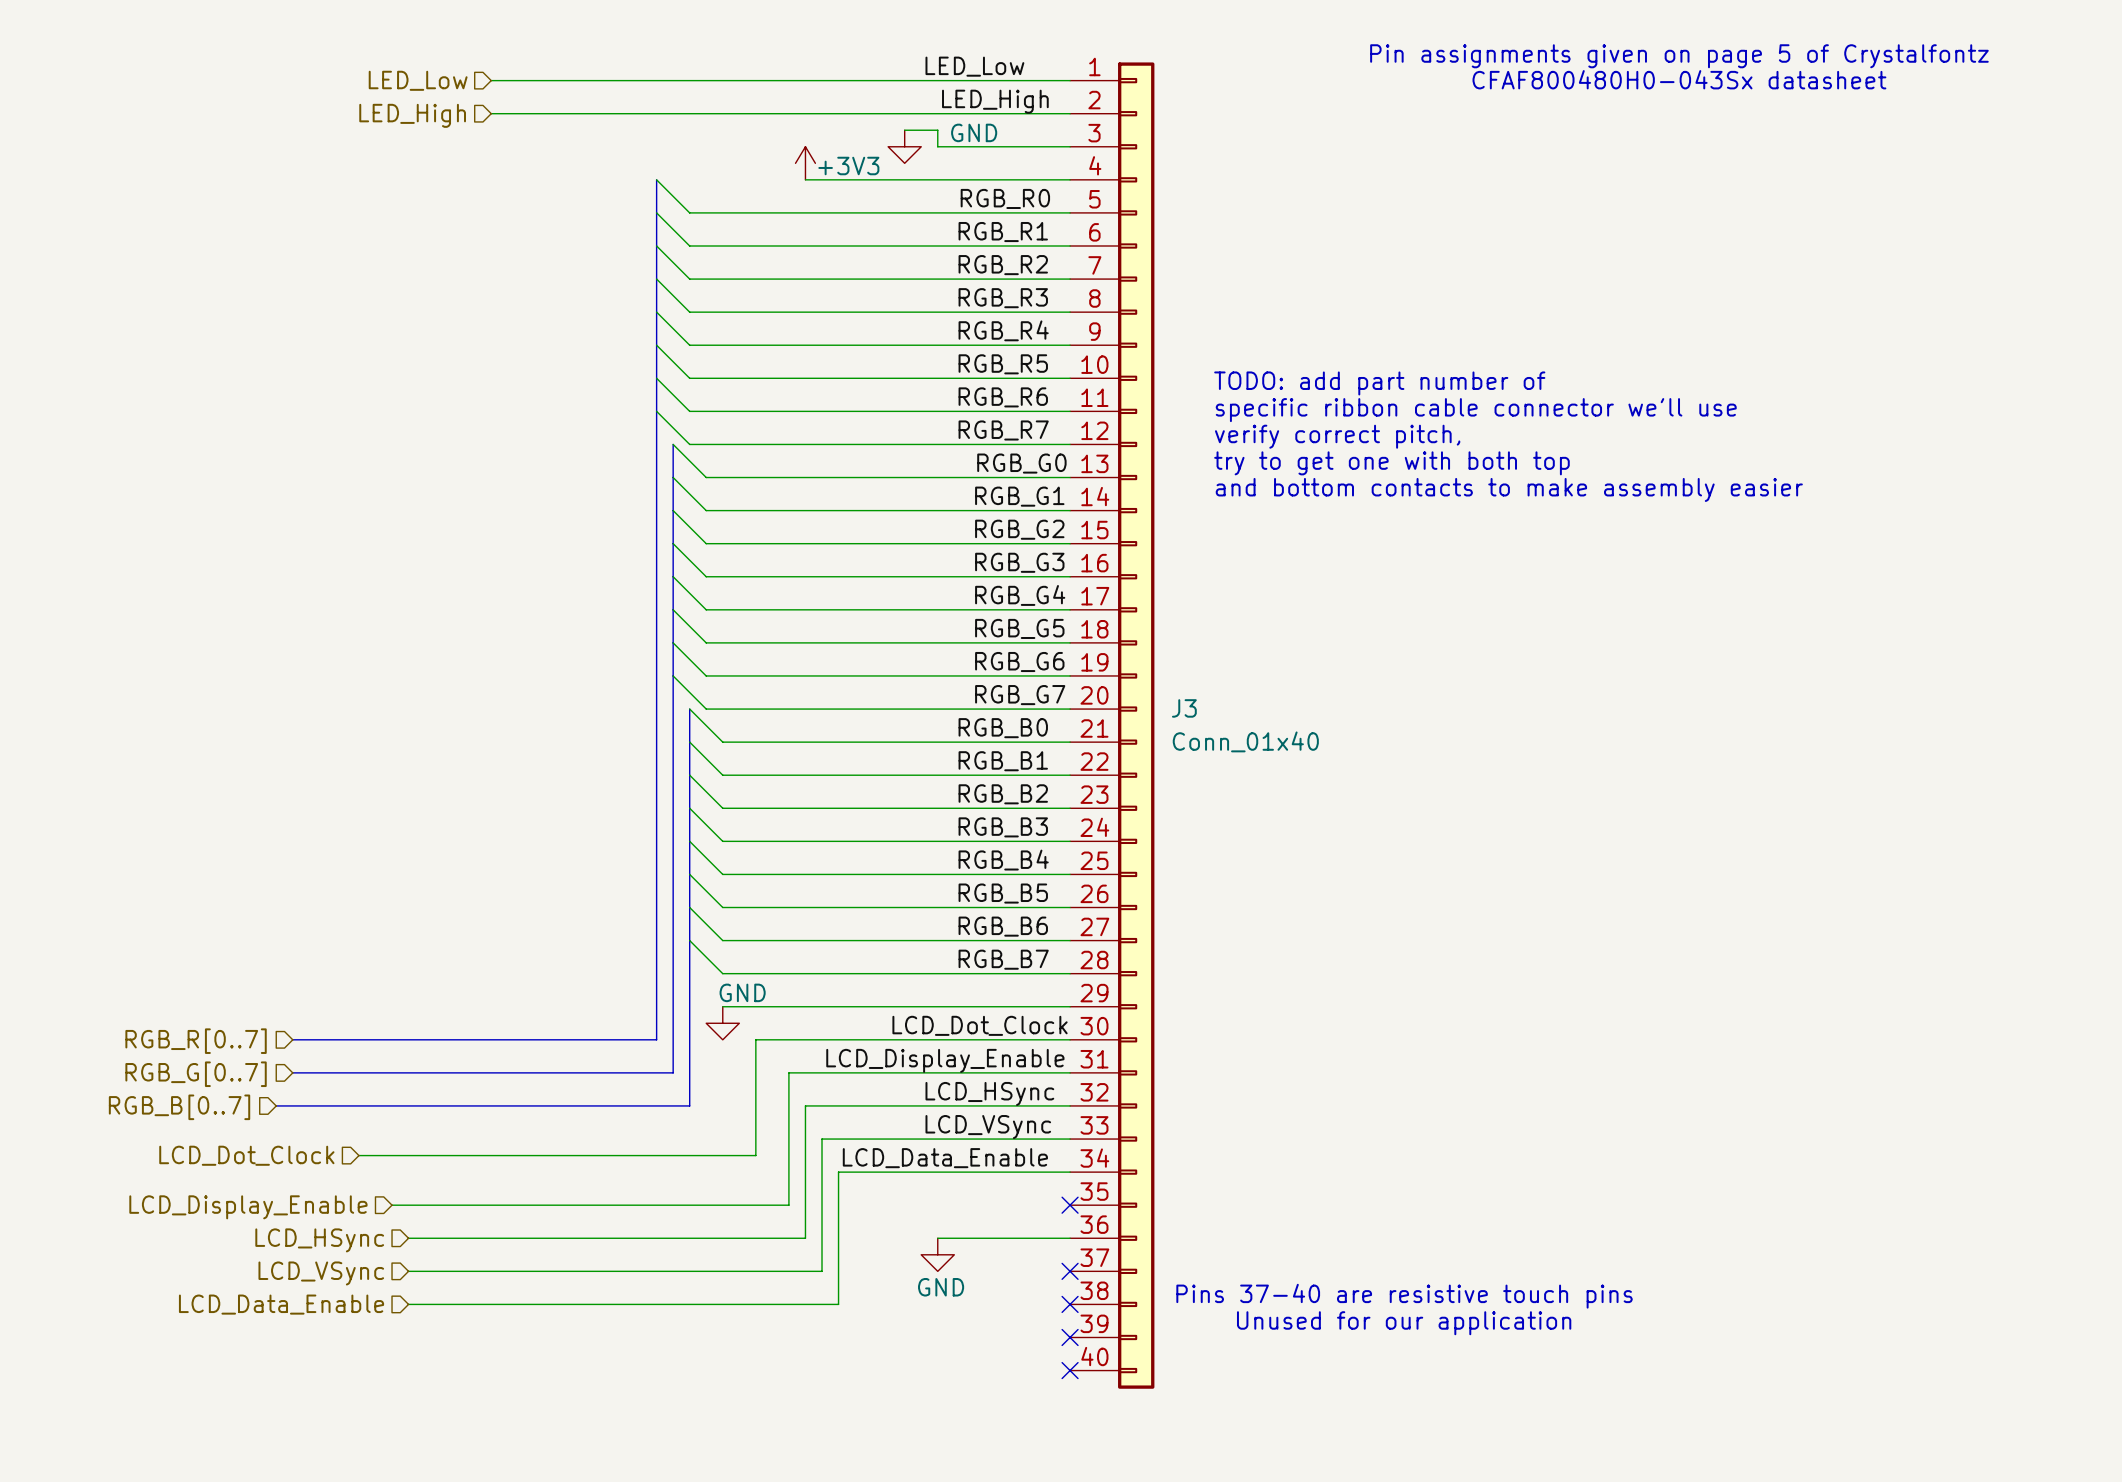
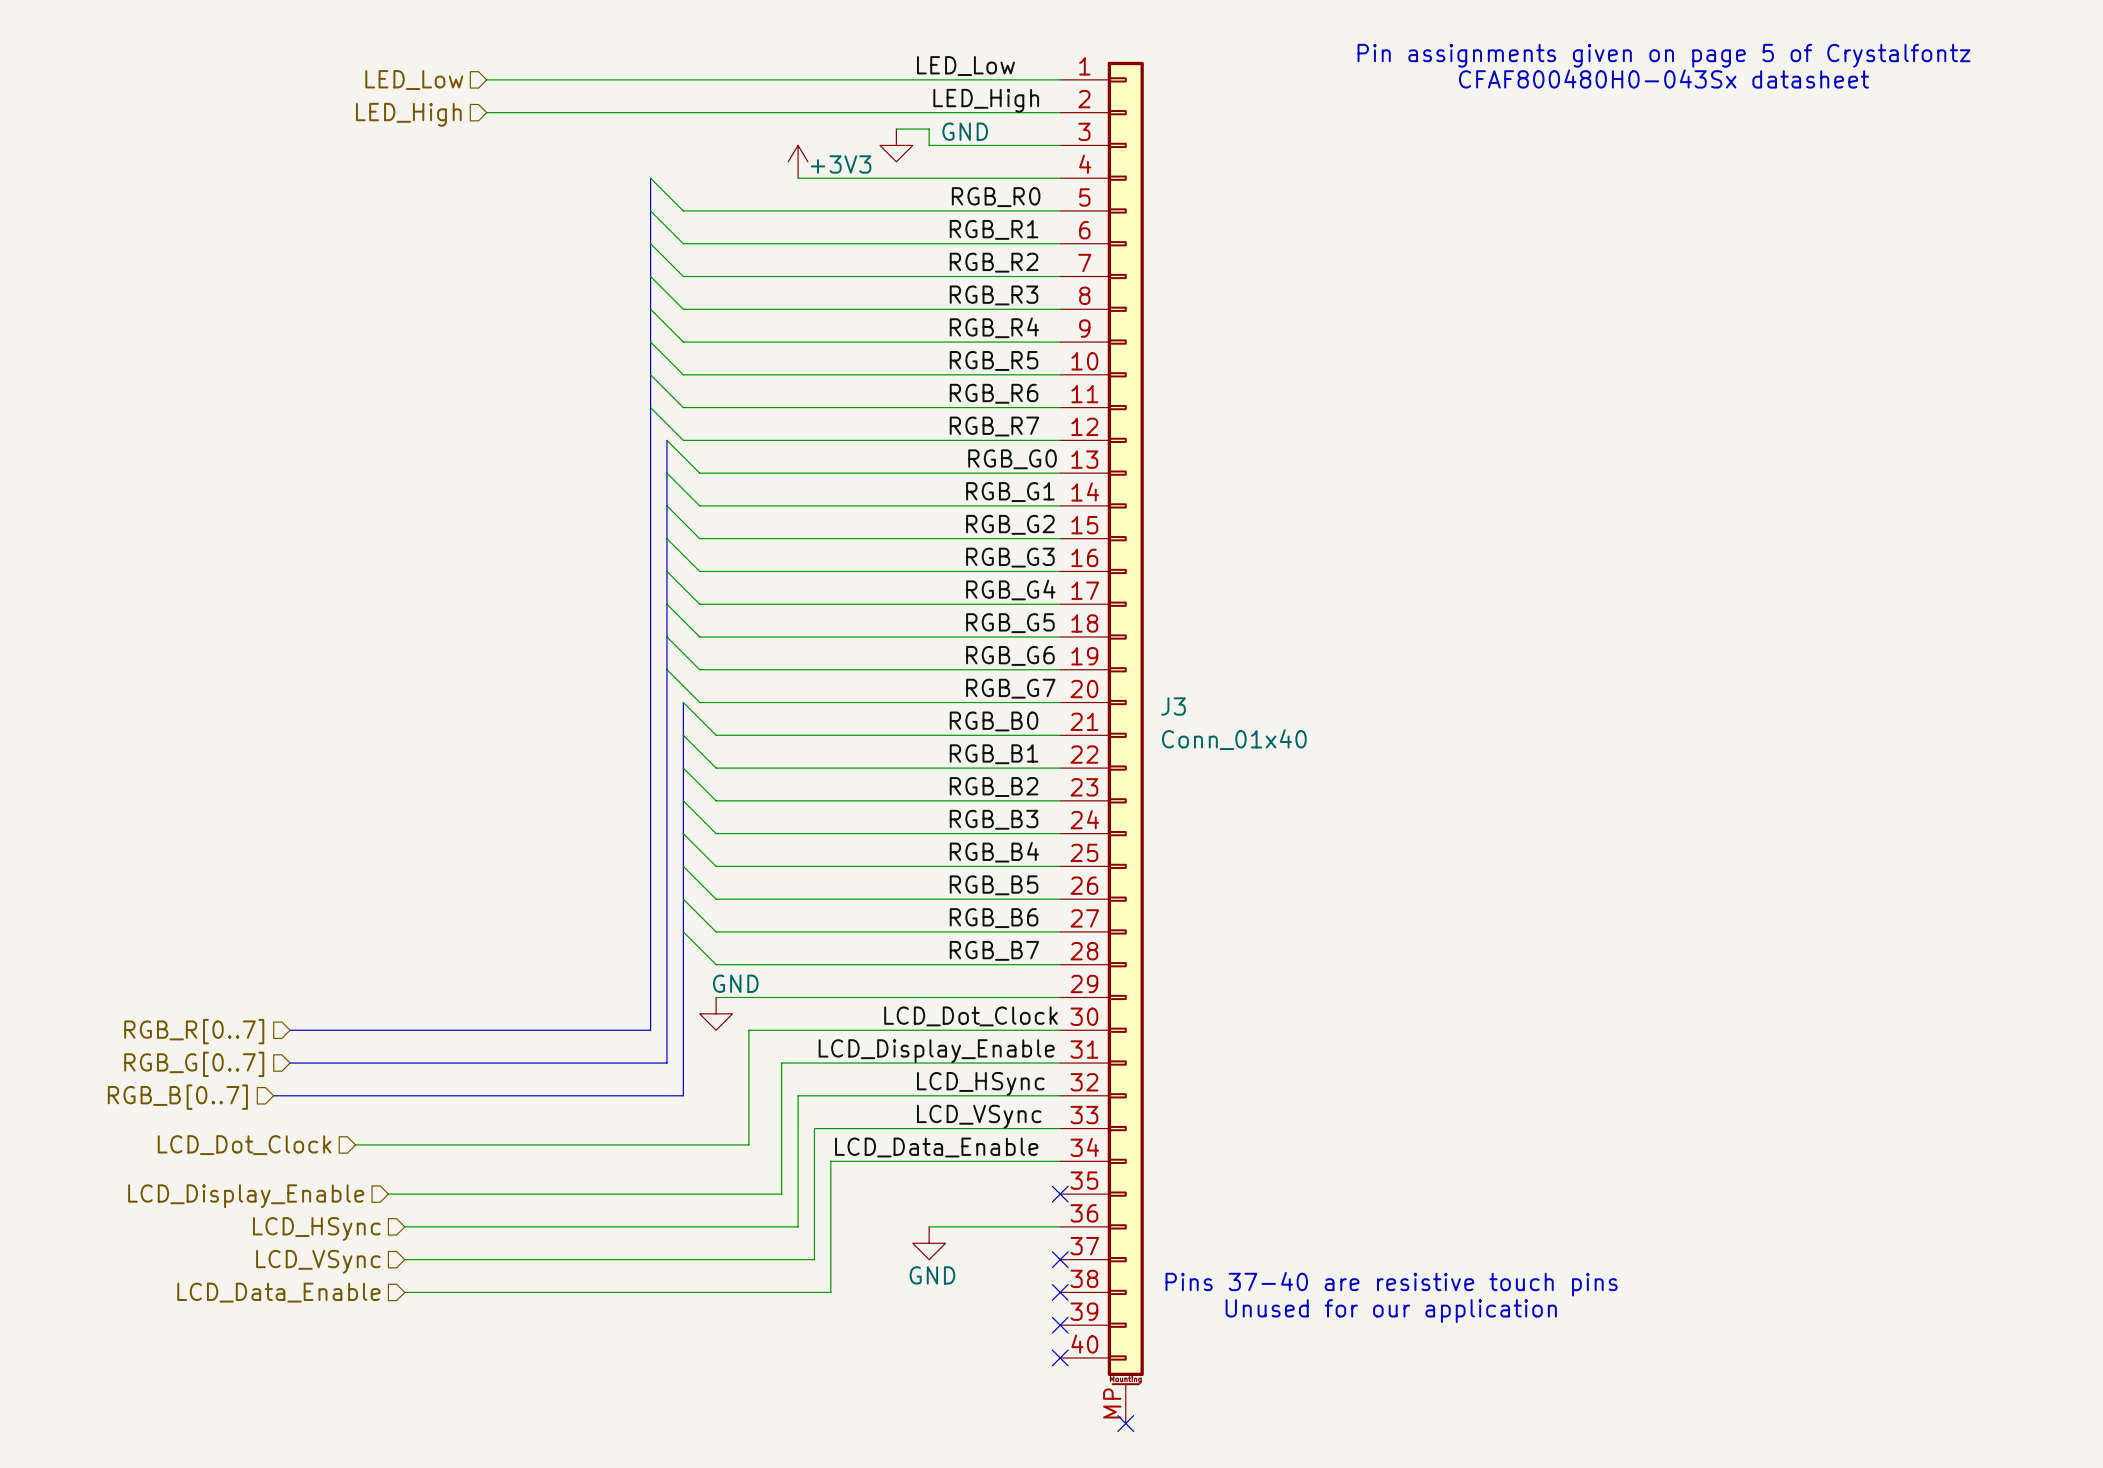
J3 symbol: [1070, 62, 1155, 1389] -> [1060, 61, 1144, 1424]
text: TODO: add part number of (1379, 383) -> none
text: specific ribbon cable connector we'll use (1476, 410) -> none
text: verify correct pitch, (1337, 436) -> none
text: try to get one with both top (1391, 463) -> none
text: and bottom contacts to make assembly easier (1509, 489) -> none
no-connect mark: none -> (1125, 1423)

